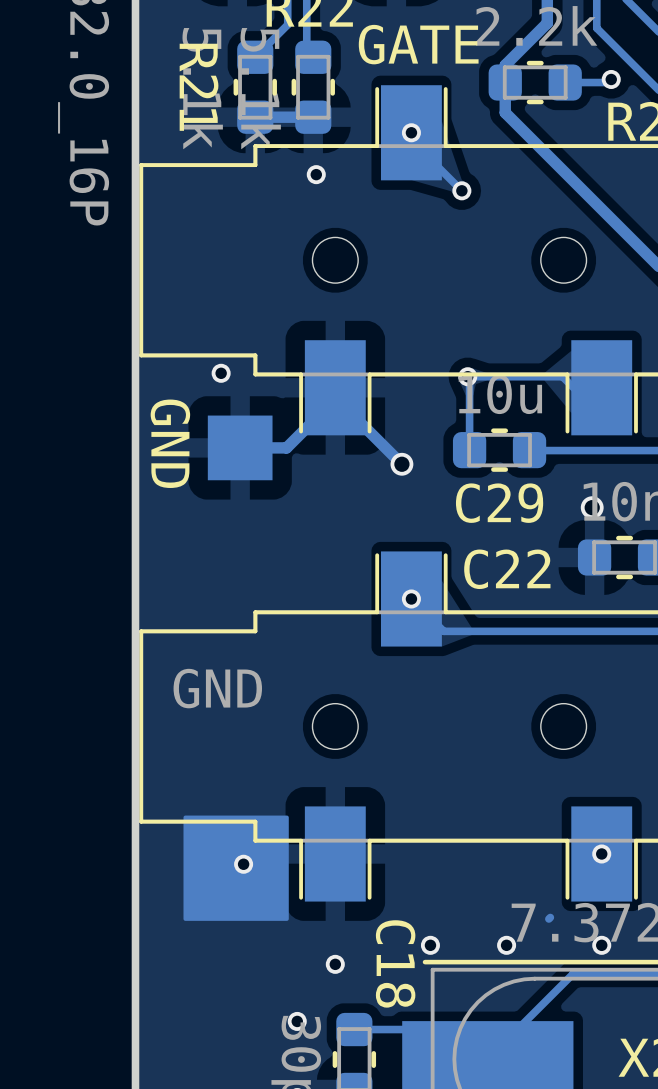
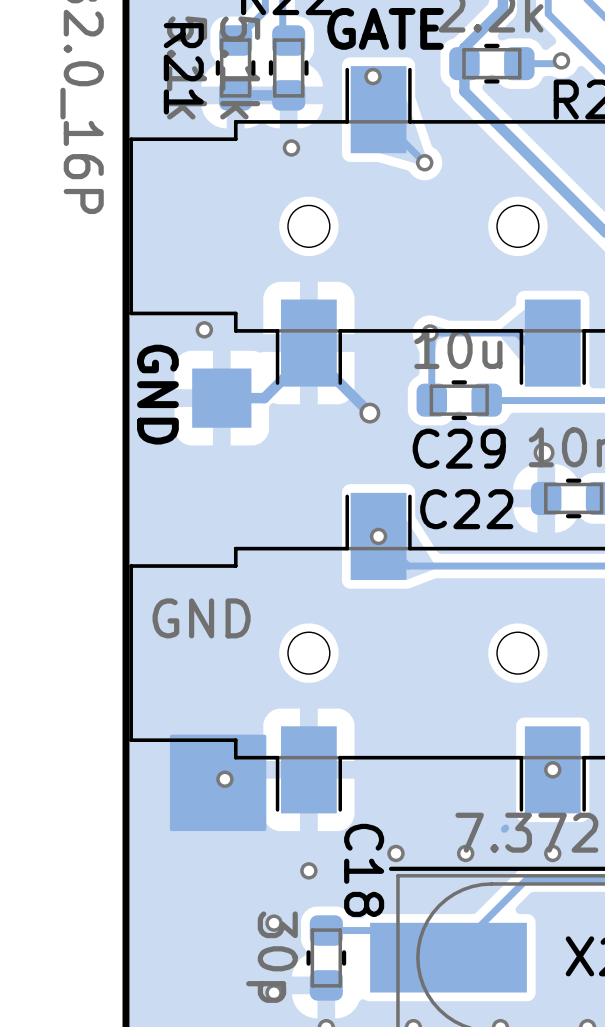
via position: (411, 132) -> (372, 76)

